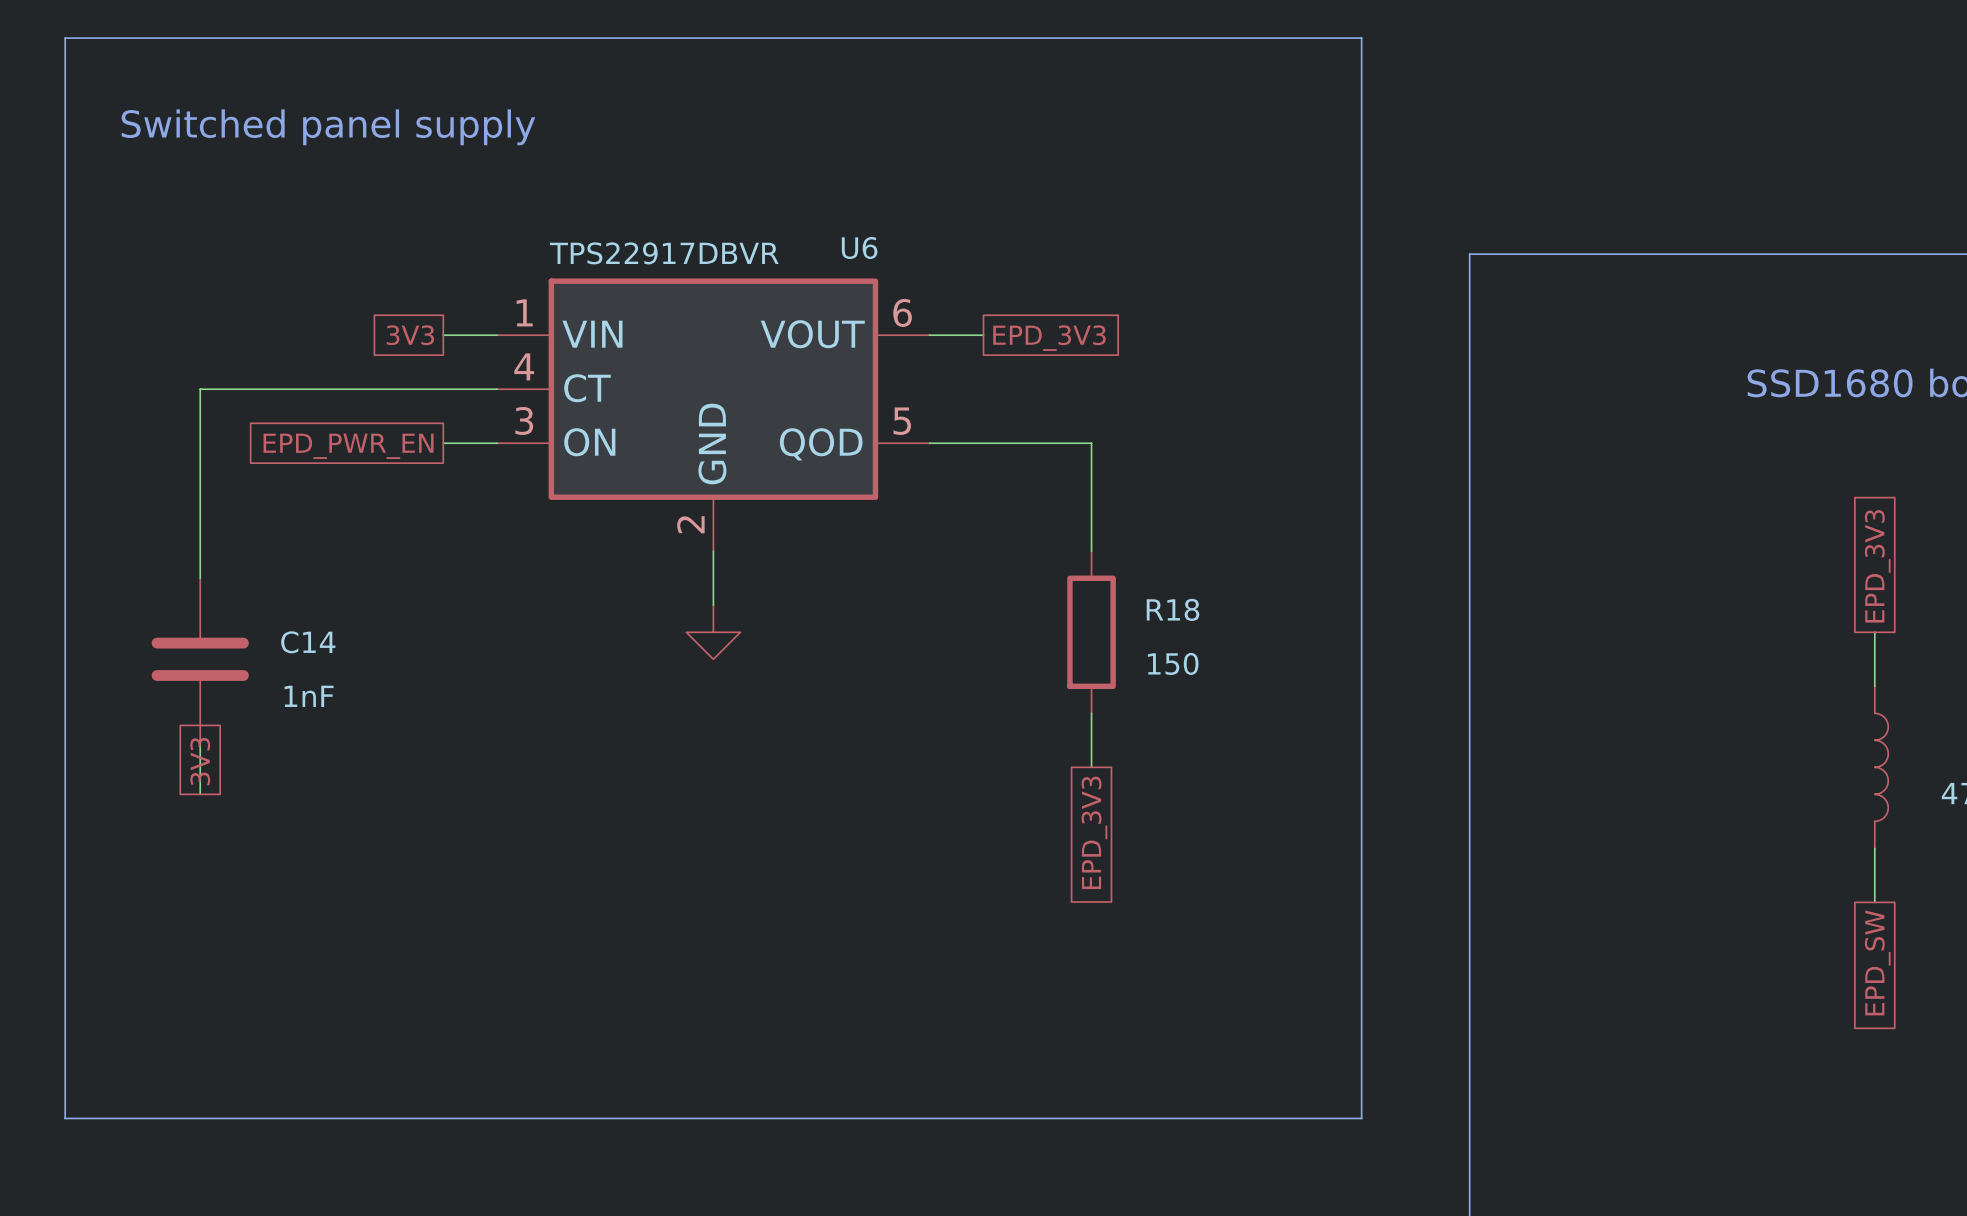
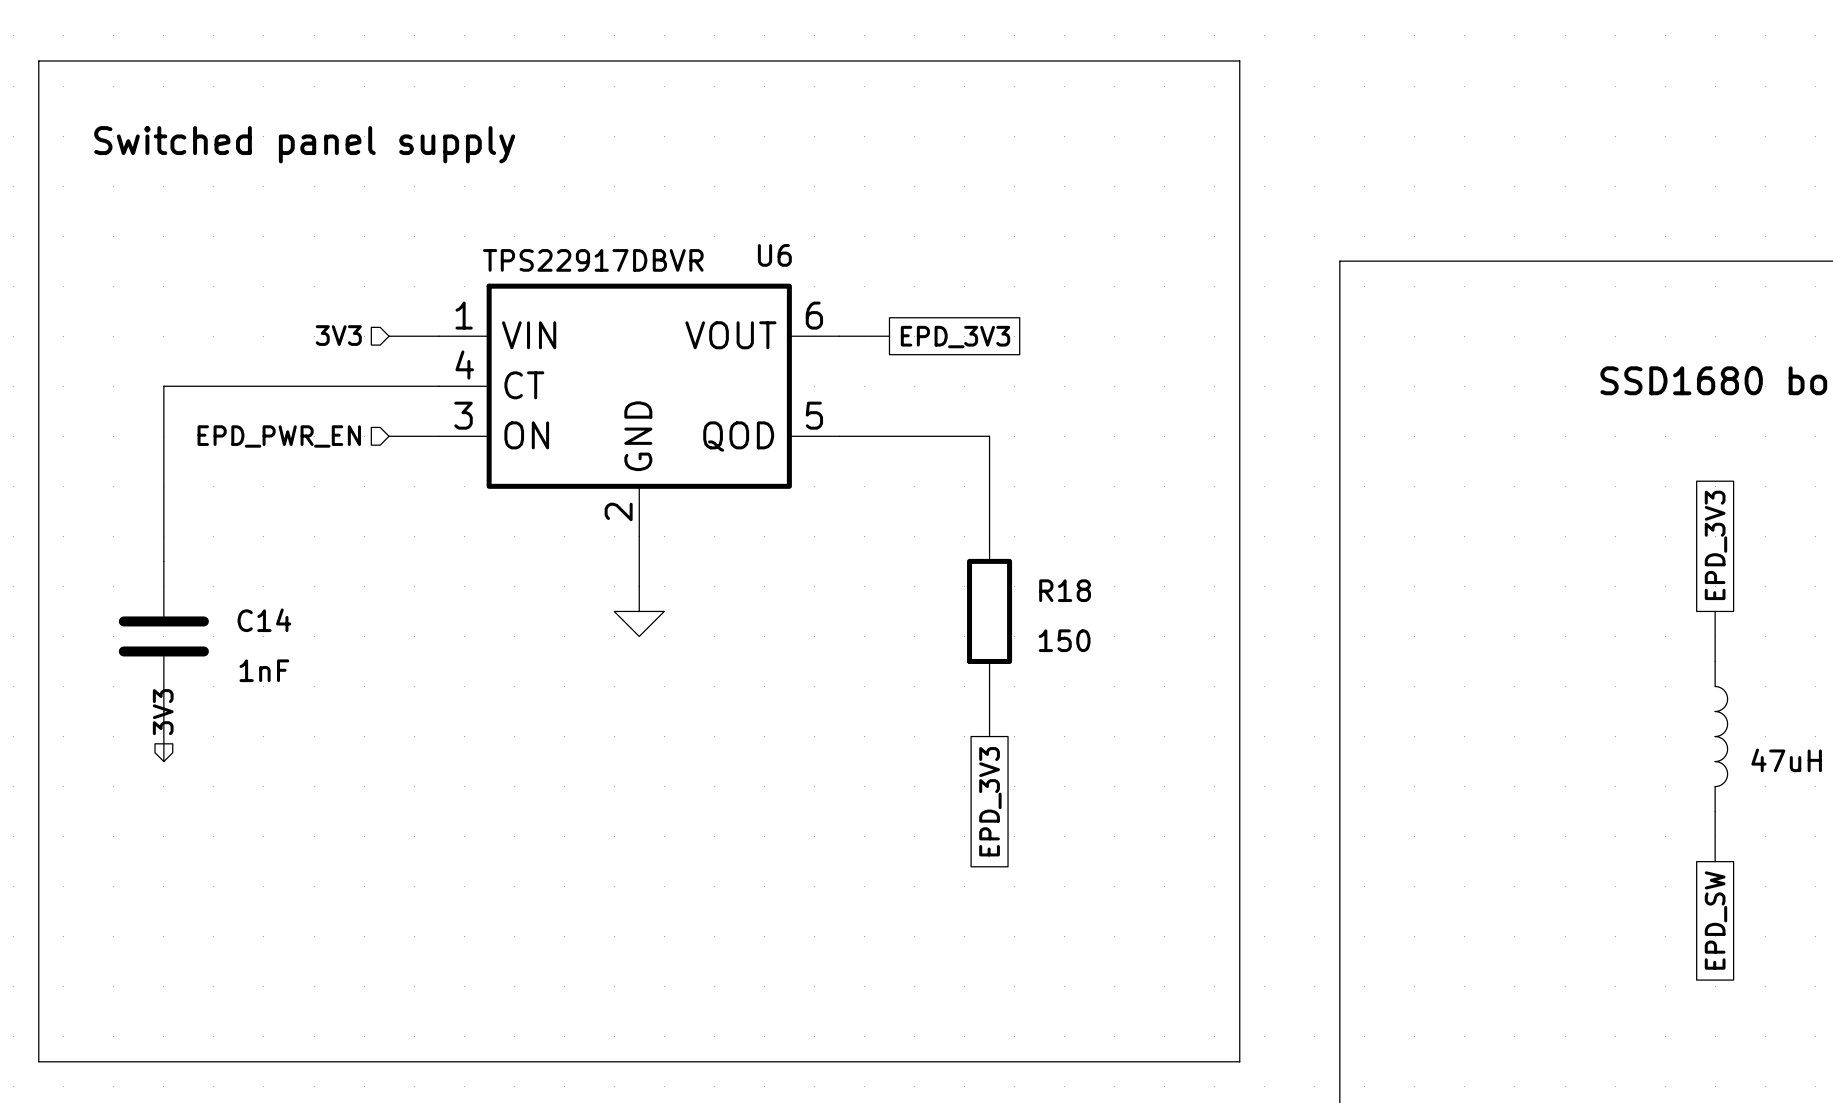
hierarchical label: none -> 3V3 (338, 335)
global label: 3V3 (410, 335) -> none
hierarchical label: none -> EPD_PWR_EN (279, 436)
global label: EPD_PWR_EN (348, 446) -> none
hierarchical label: none -> 3V3 (163, 712)
global label: 3V3 (200, 761) -> none

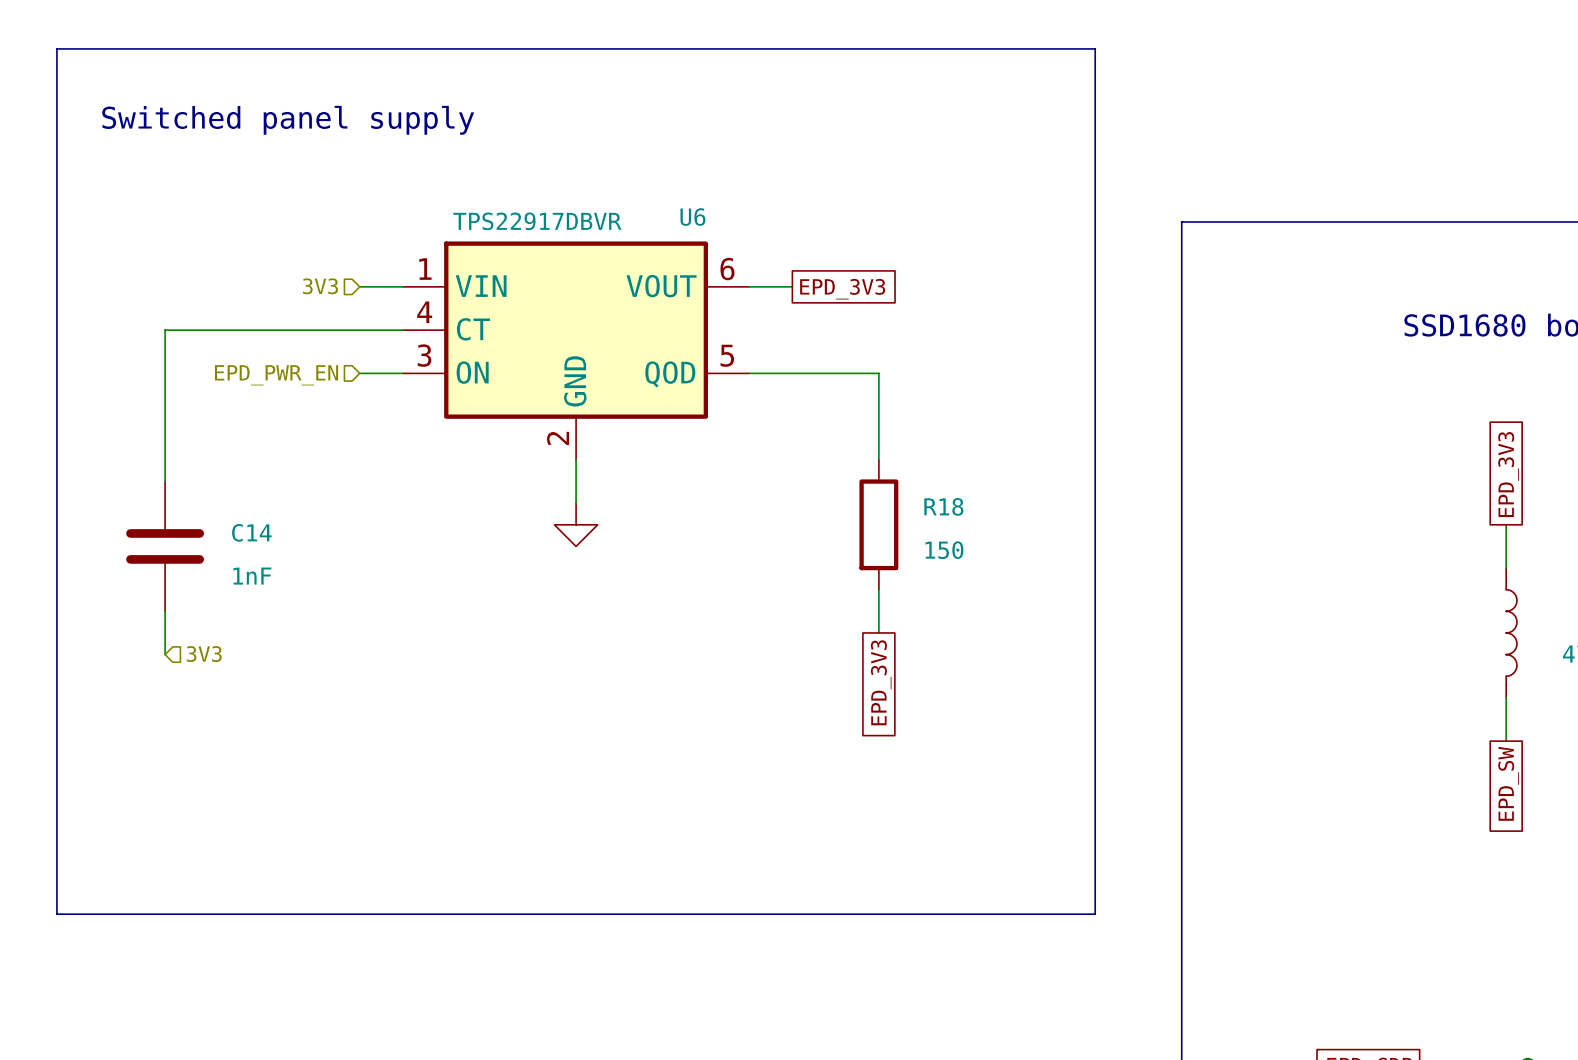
hierarchical label rotation: 0° (163, 712) -> 90° clockwise (204, 654)
hierarchical label position: 3V3 (163, 712) -> 3V3 (204, 654)

